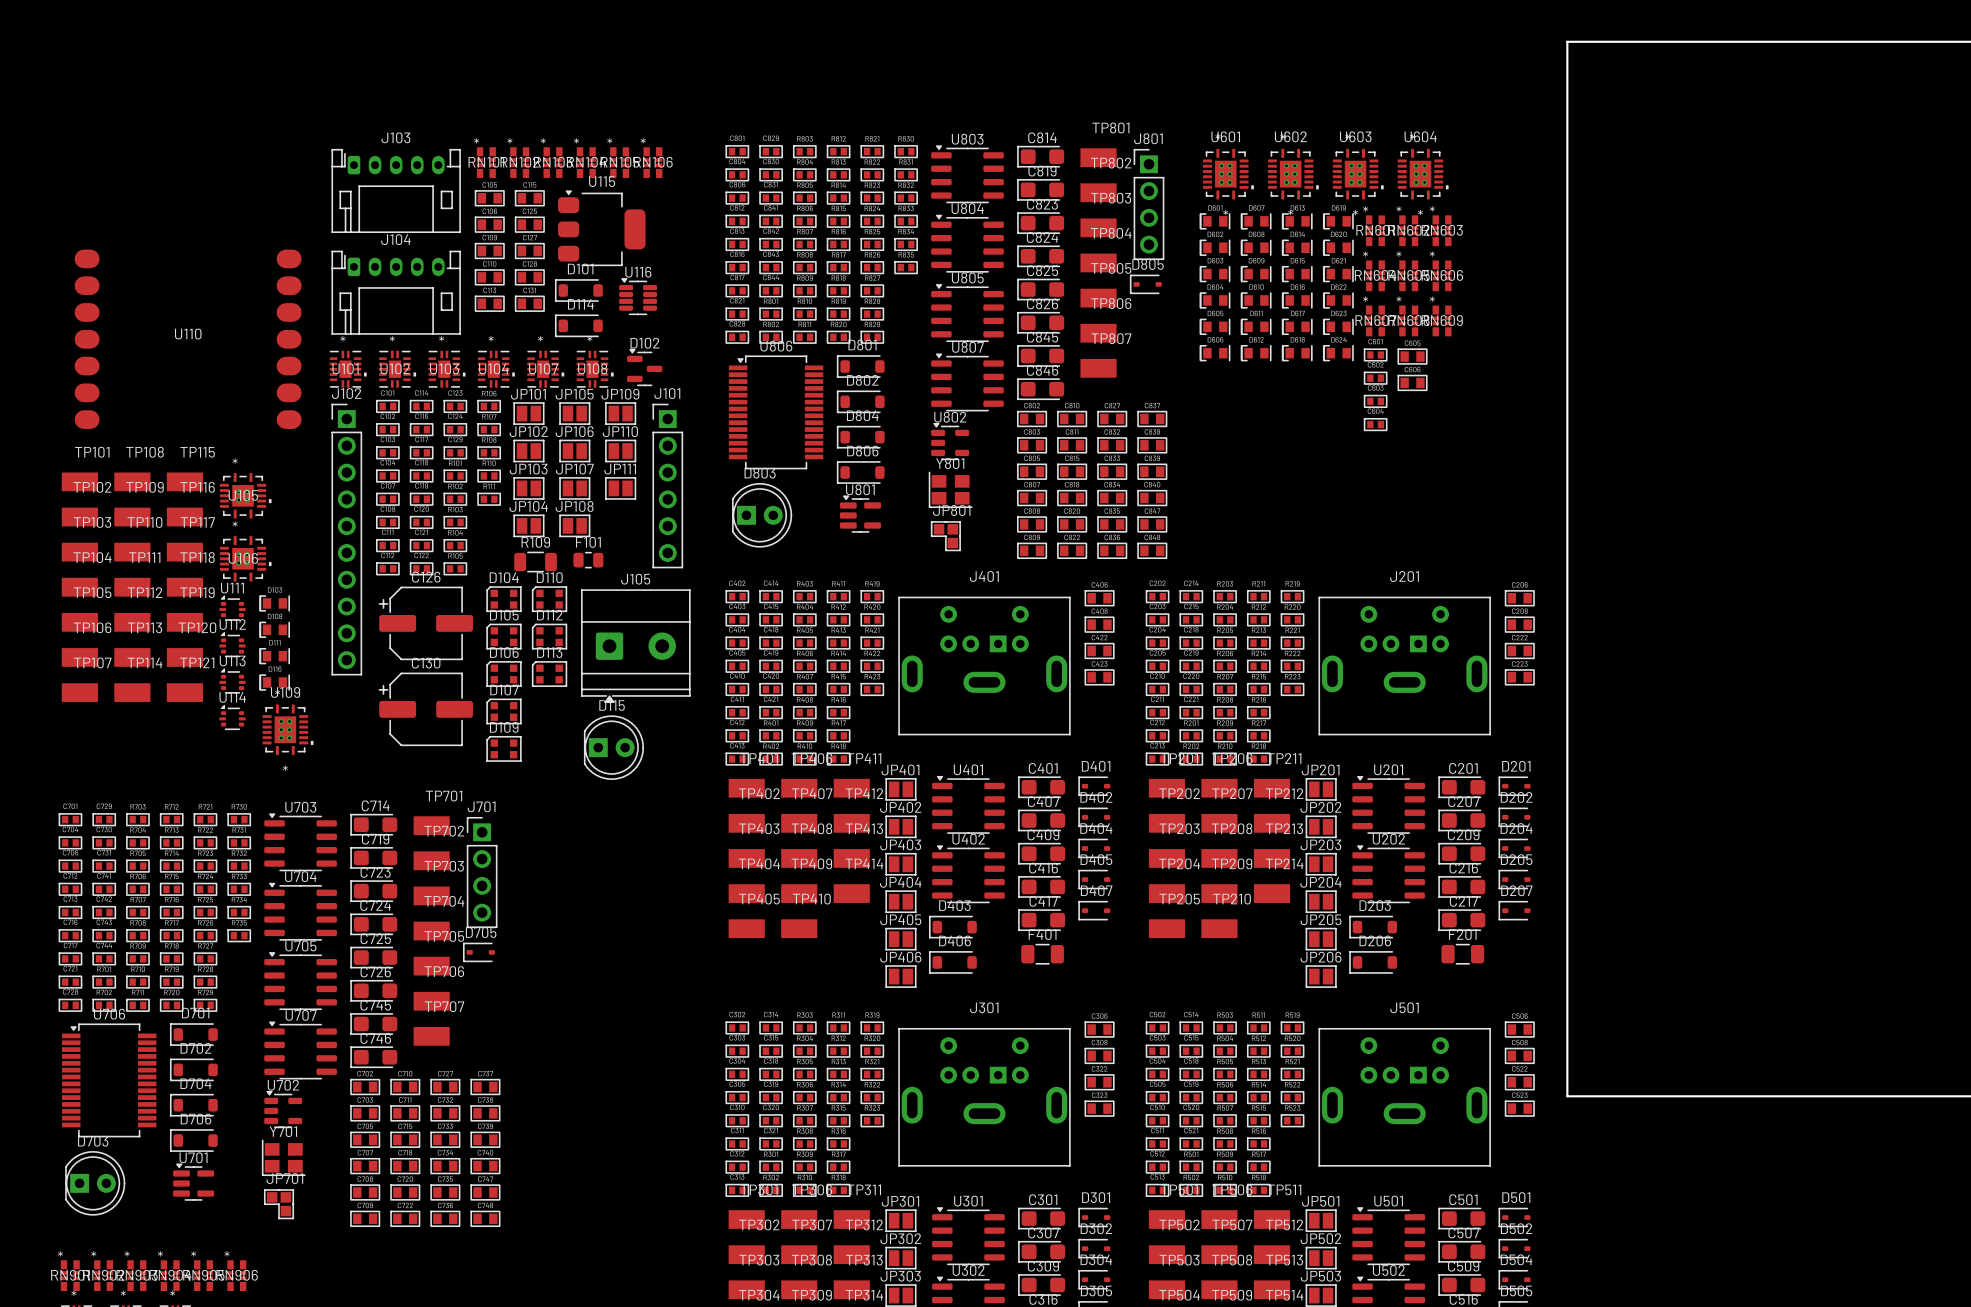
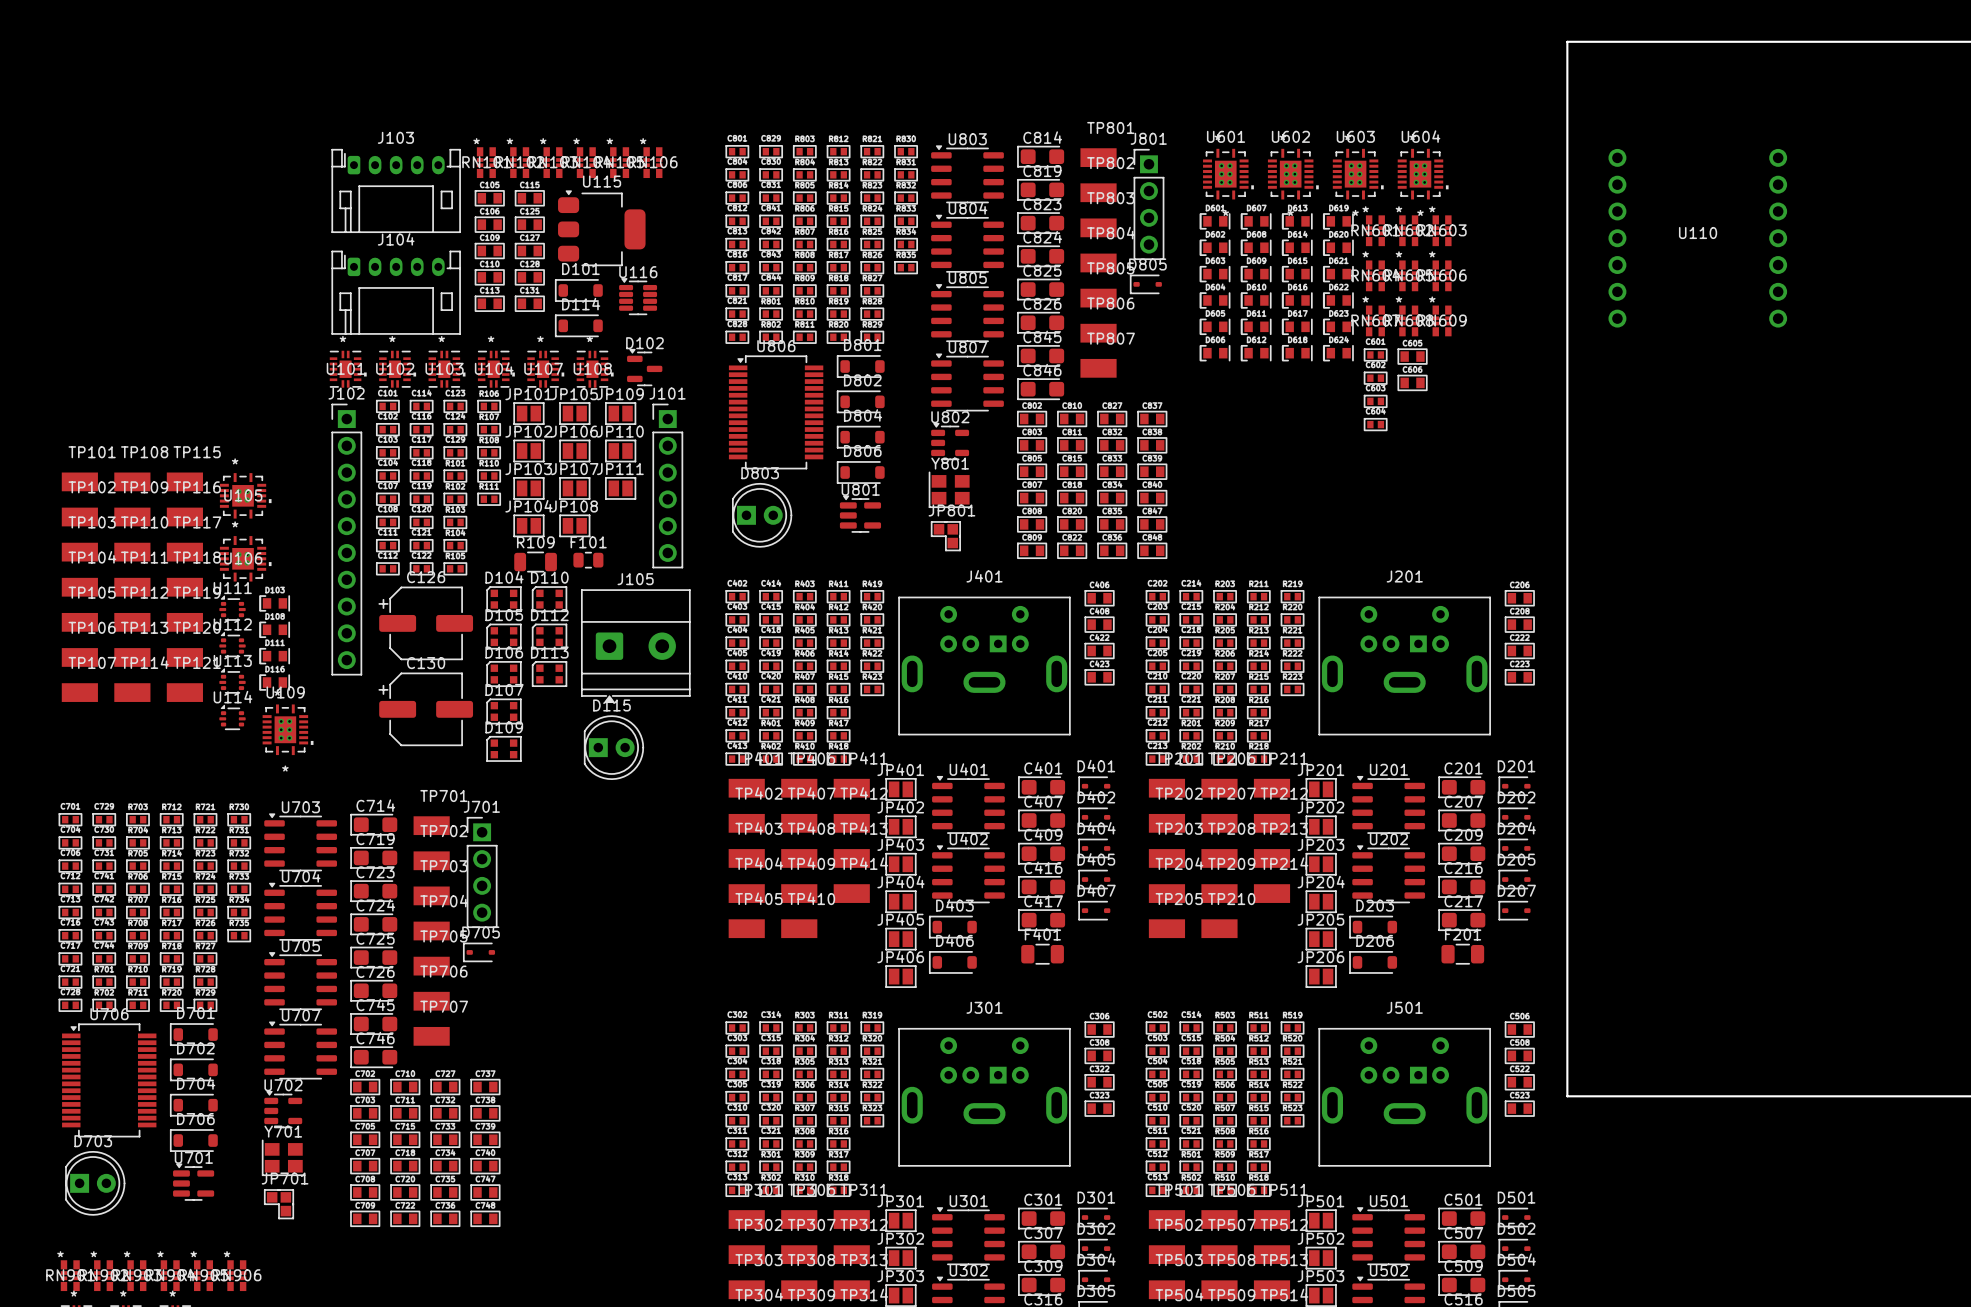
U110 footprint: [74, 249, 302, 430] -> [1608, 148, 1788, 328]

